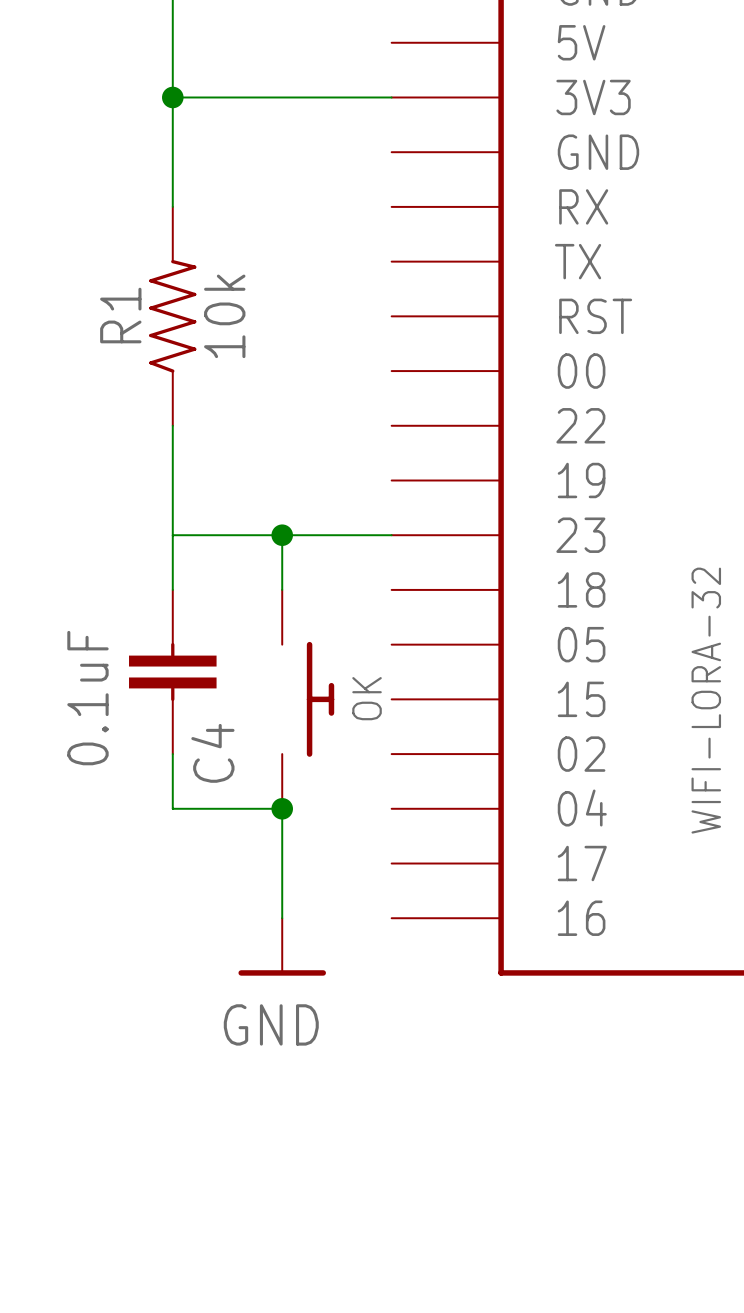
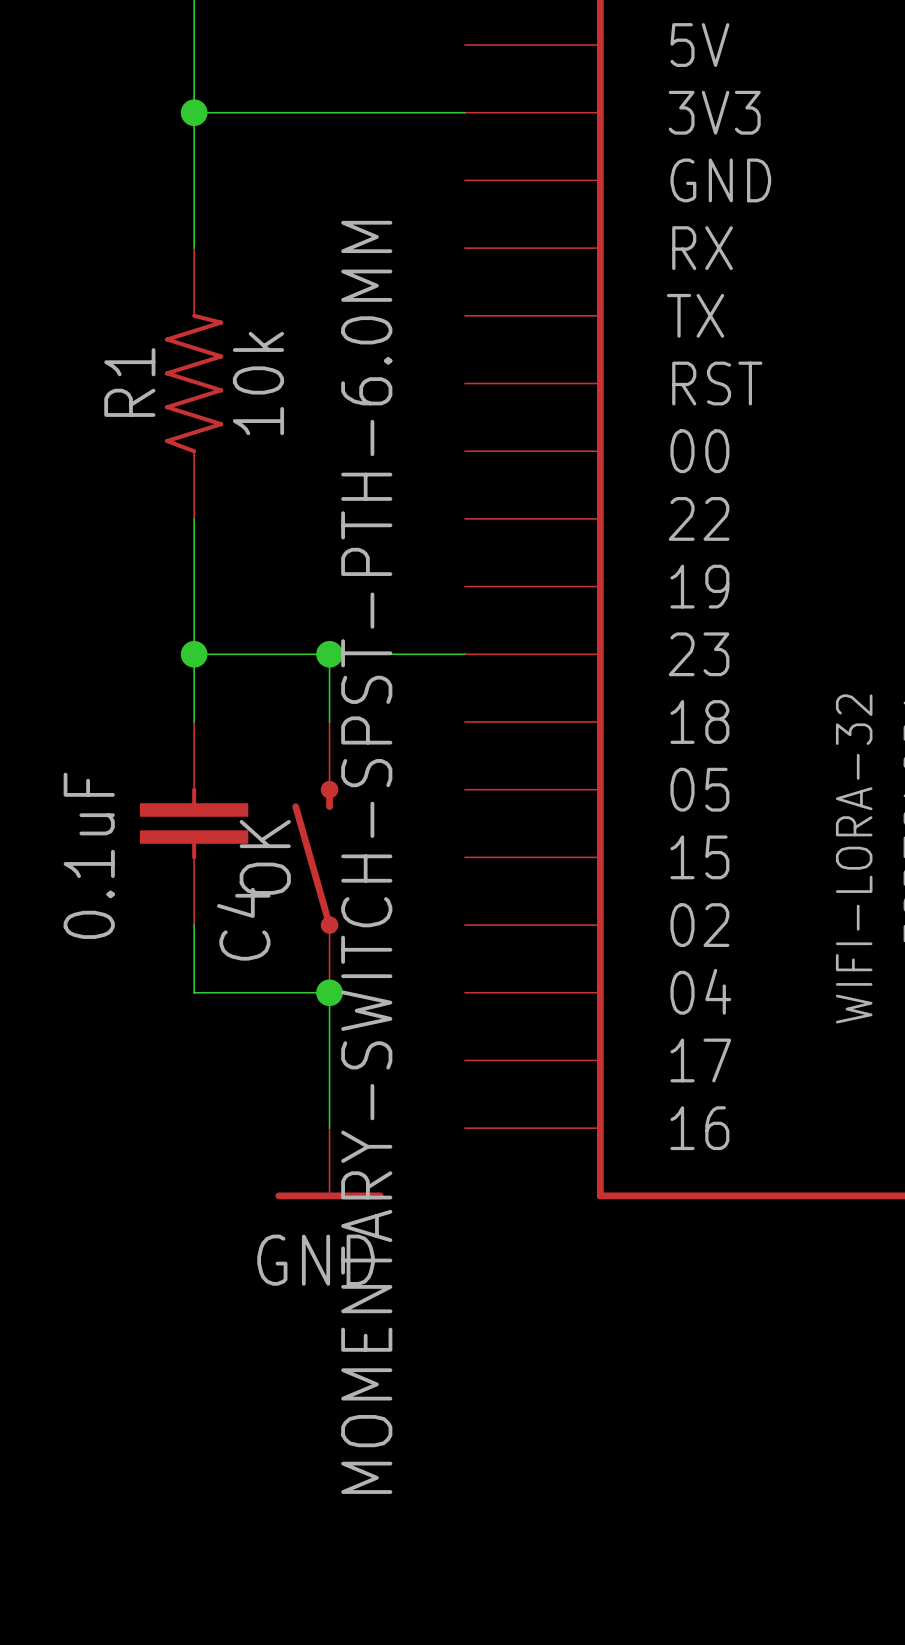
junction: none -> (194, 654)
OK: none -> MOMENTARY-SWITCH-SPST-PTH-6.0MM (315, 857)
OK: (308, 699) -> none

